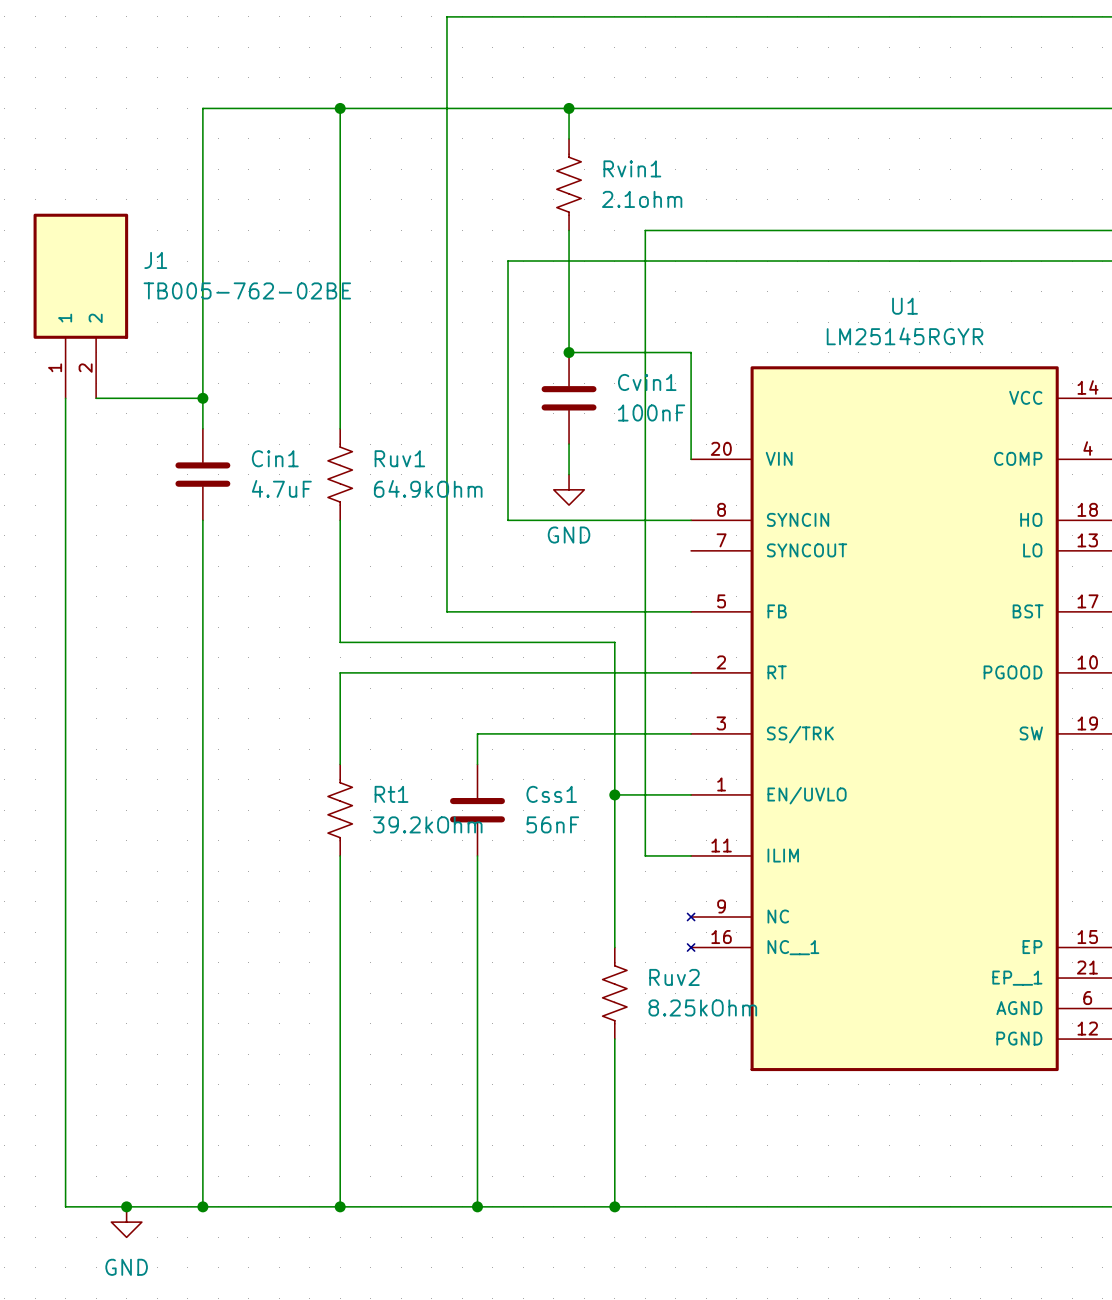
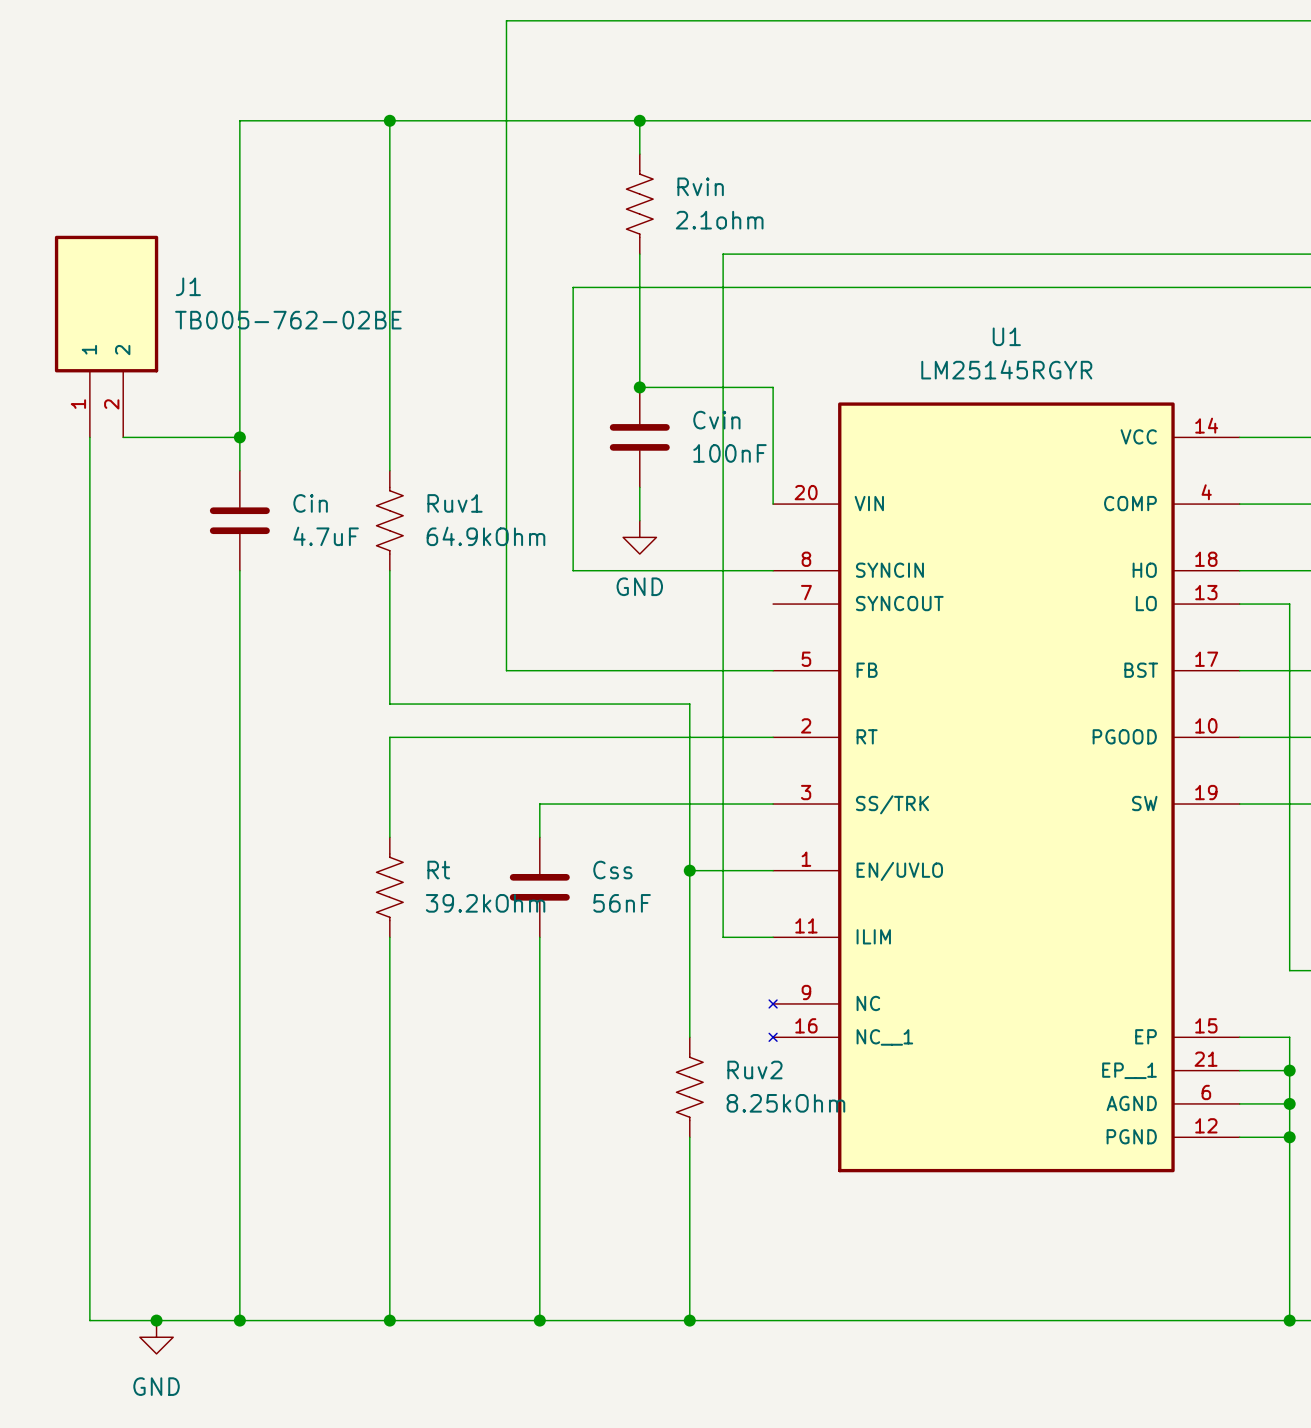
Rvin1 name: Rvin1 (632, 168) -> Rvin (700, 186)
Cvin1 name: Cvin1 (647, 382) -> Cvin (716, 420)
Cin1 name: Cin1 (275, 458) -> Cin (310, 503)
Rt1 name: Rt1 (391, 794) -> Rt (438, 870)
Css1 name: Css1 (551, 794) -> Css (612, 870)

